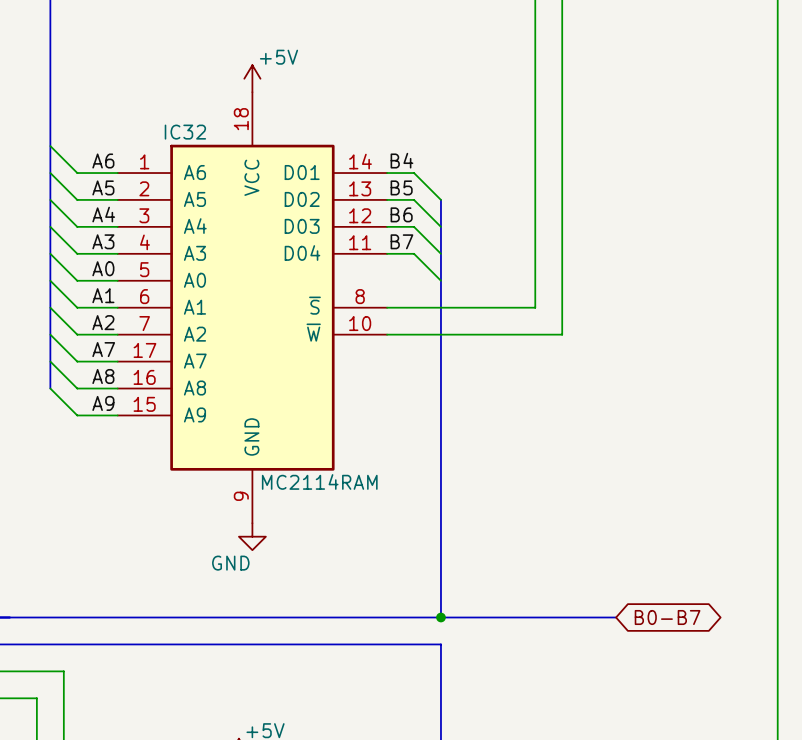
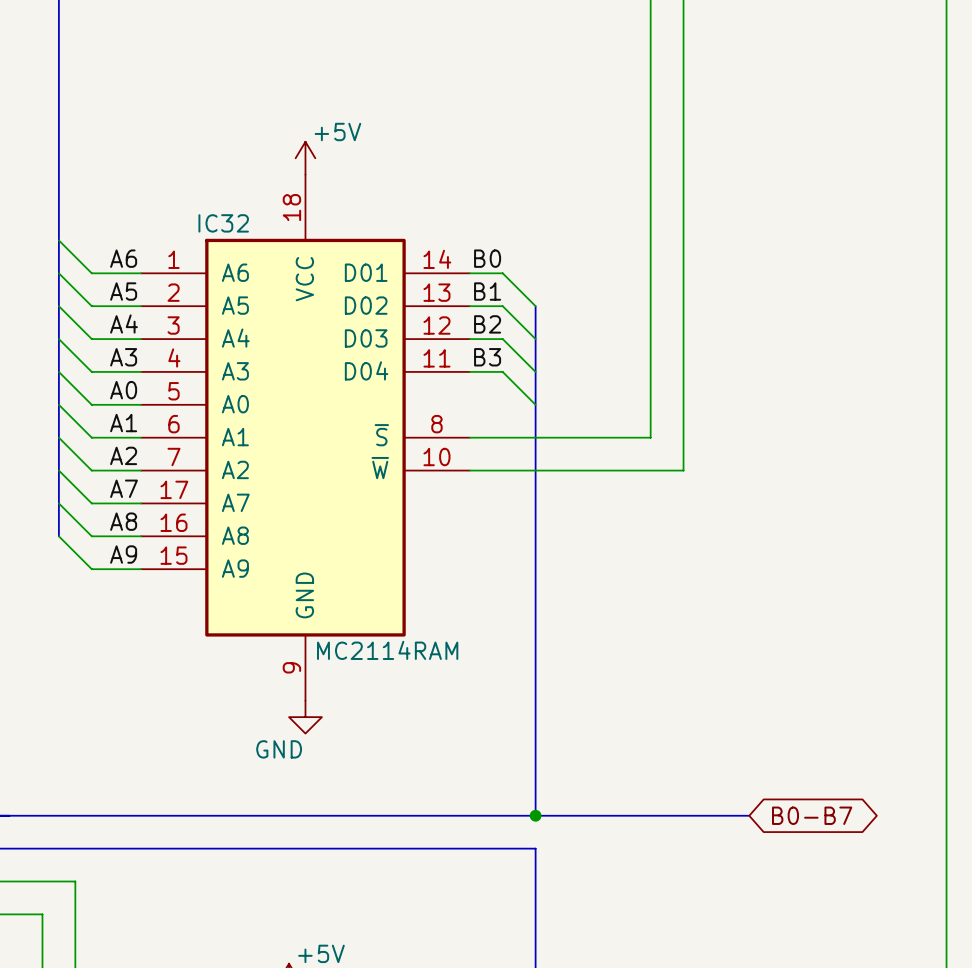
label: B4 (401, 160) -> B0 (487, 258)
label: B5 (401, 187) -> B1 (487, 291)
label: B6 (401, 214) -> B2 (487, 324)
label: B7 (401, 241) -> B3 (487, 357)

